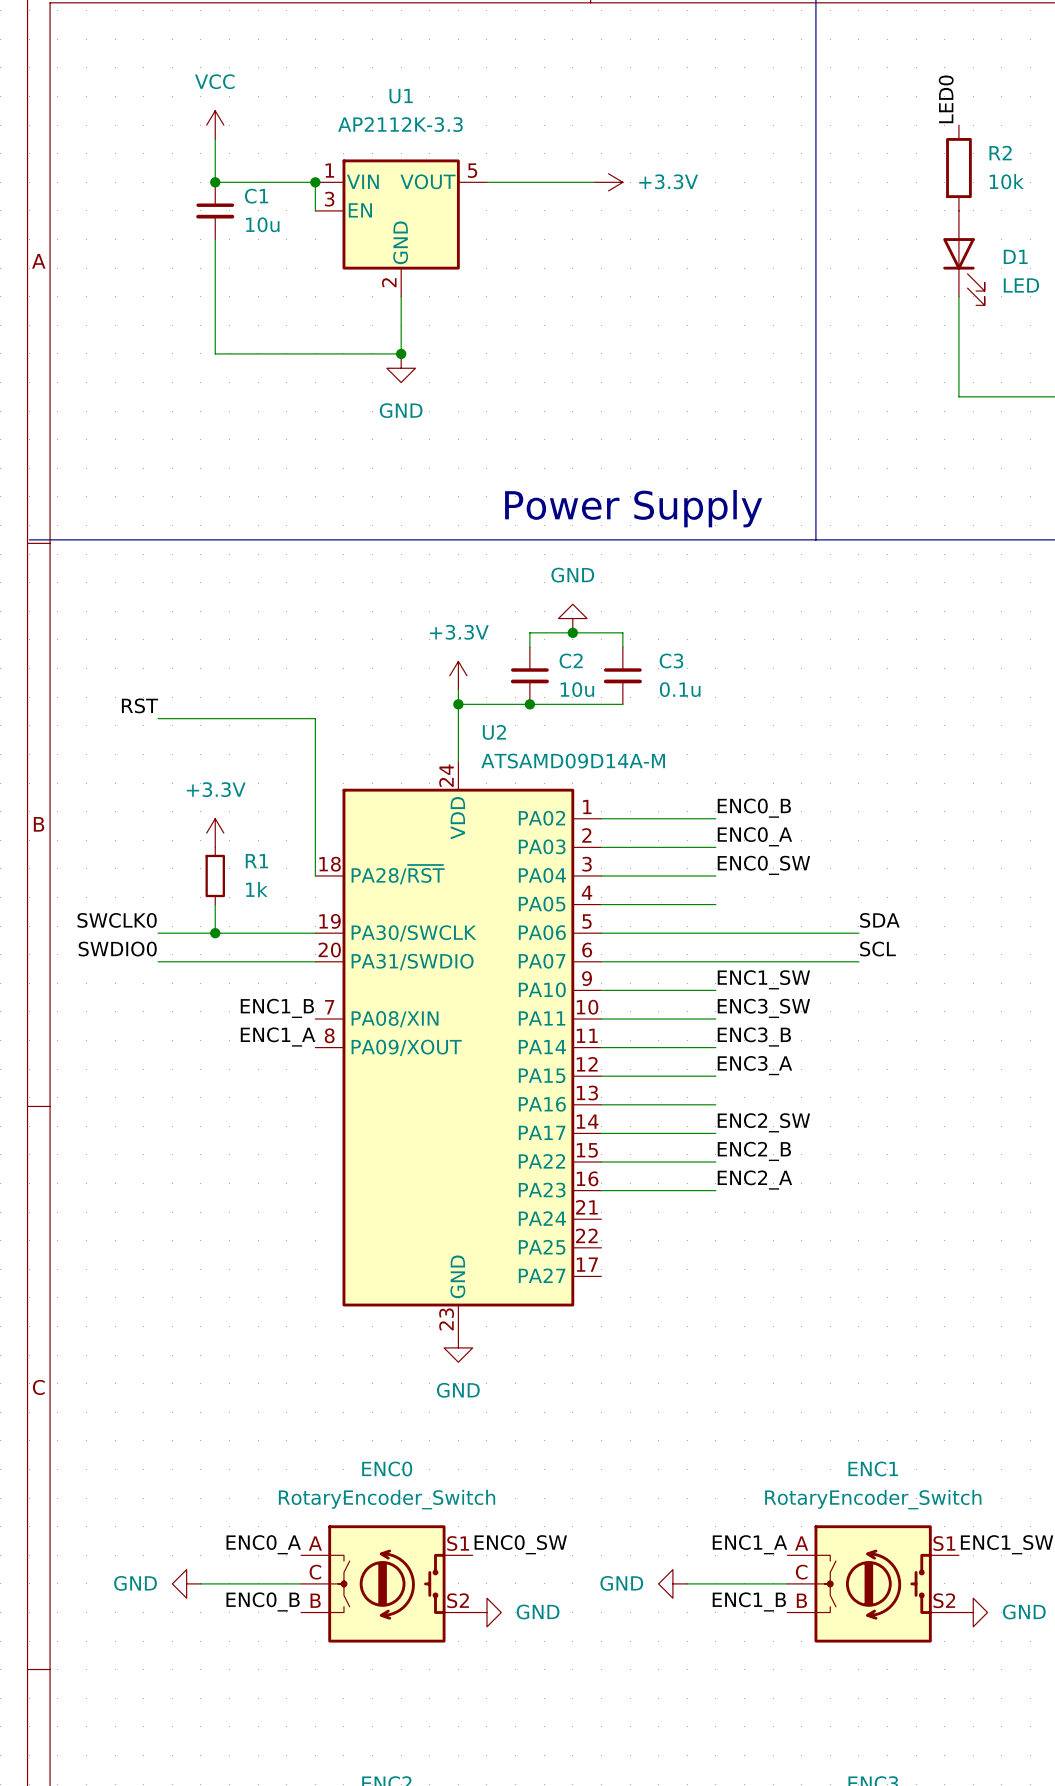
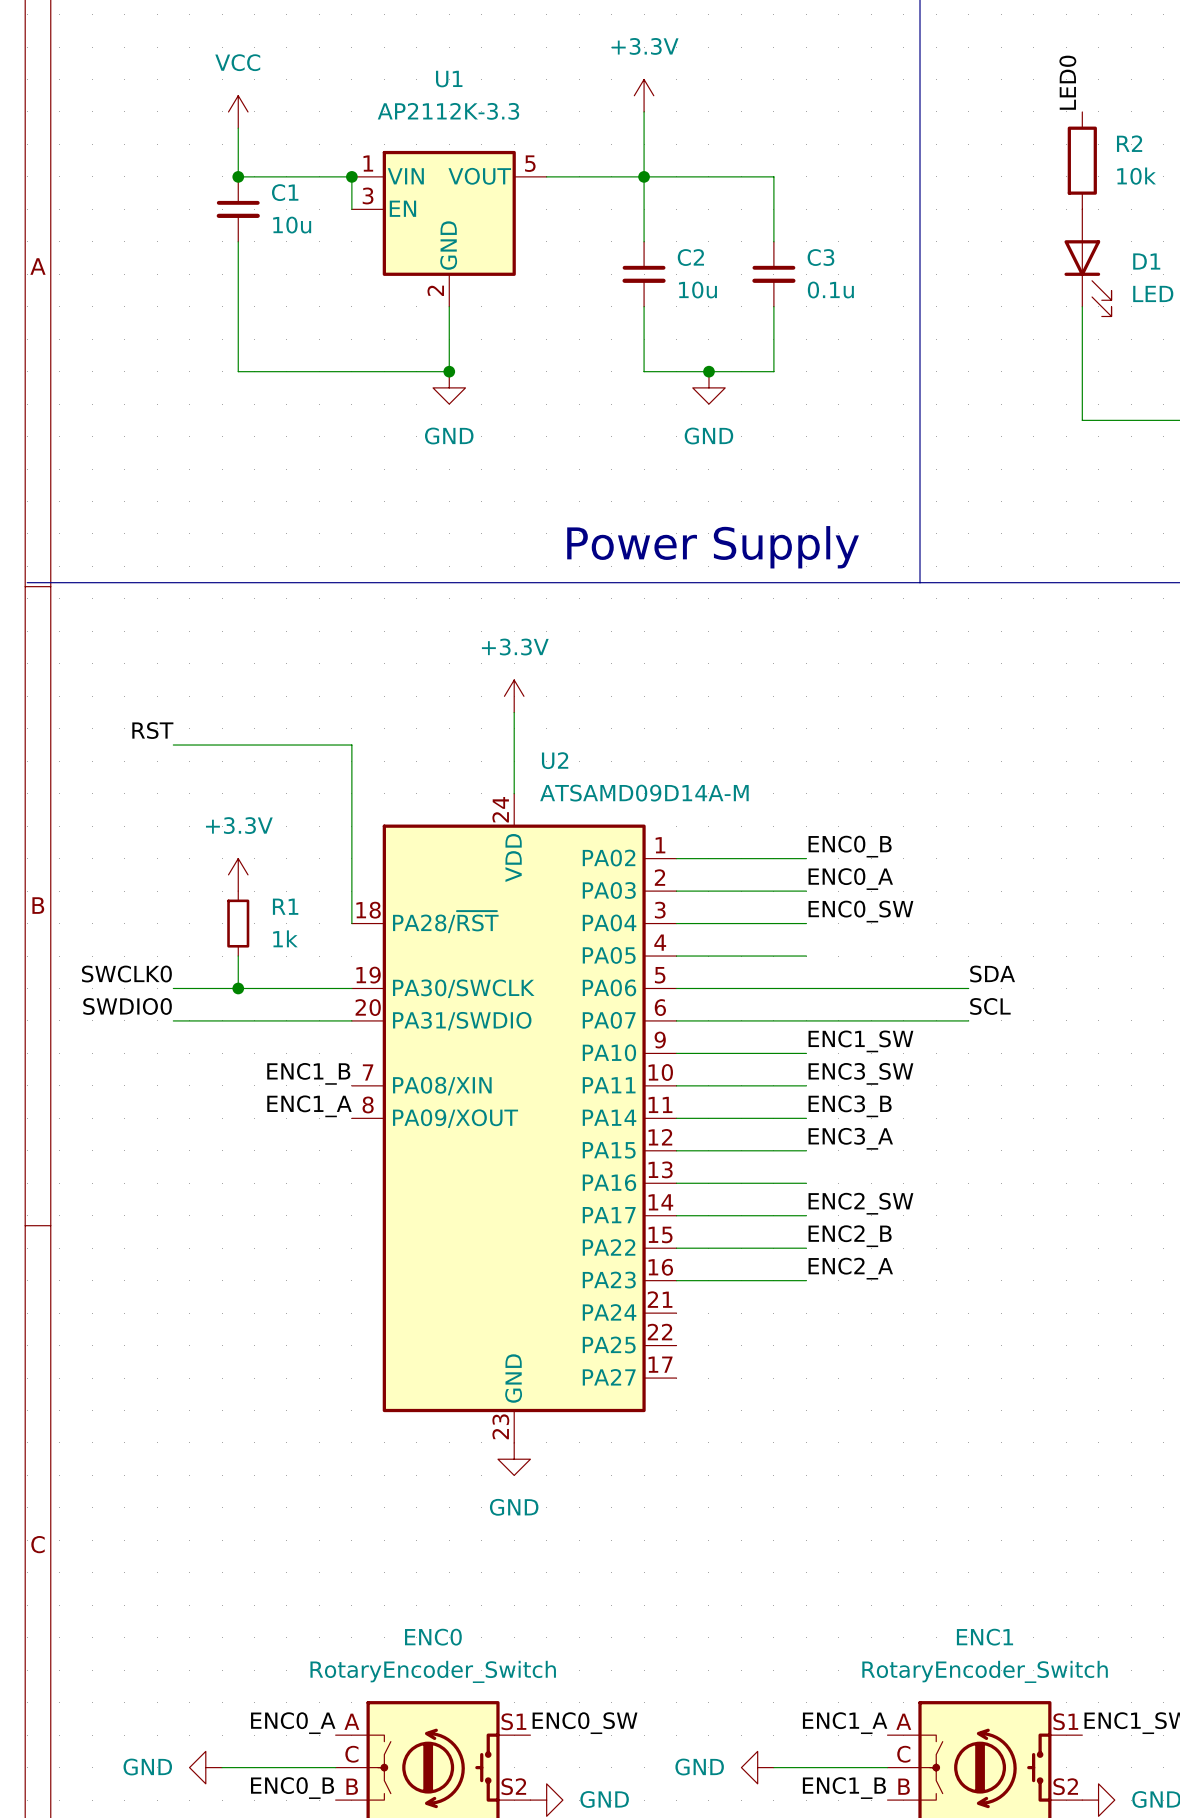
wire: none -> (644, 111) (644, 241)
power symbol text position: +3.3V (668, 181) -> +3.3V (645, 46)
junction: none -> (644, 176)
wire: none -> (668, 176) (773, 176) (773, 241)
power symbol rotation: 0° (608, 182) -> 90° counterclockwise (644, 95)
power symbol position: +3.3V (608, 182) -> +3.3V (644, 95)
wire: none -> (644, 306) (644, 371) (773, 371) (773, 306)
junction: none -> (708, 371)
power symbol rotation: 0° (572, 618) -> 180° (708, 387)
power symbol position: GND (572, 618) -> GND (708, 387)
junction: (572, 632) -> none
wire: (529, 647) (529, 632) (622, 632) (622, 647) -> none
C3 name position: C3 (671, 660) -> C3 (820, 257)
power symbol position: +3.3V (458, 675) -> +3.3V (514, 696)
C2 position: (529, 675) -> (644, 274)
C3 position: (622, 675) -> (773, 274)
C3 value position: 0.1u (680, 689) -> 0.1u (830, 290)
wire: (458, 704) (622, 704) -> none
junction: (458, 704) -> none
junction: (529, 704) -> none
label position: RST (140, 705) -> RST (152, 730)
wire: (158, 718) (315, 718) -> (173, 745) (351, 745) (351, 785)
label position: ENC0_B (754, 808) -> ENC0_B (850, 846)
wire: (601, 818) (715, 818) -> (676, 858) (806, 858)
power symbol position: +3.3V (215, 833) -> +3.3V (238, 874)
label position: ENC0_A (754, 836) -> ENC0_A (850, 879)
wire: (315, 840) (315, 875) -> none
wire: (601, 847) (715, 847) -> (676, 891) (806, 891)
label position: ENC0_SW (763, 865) -> ENC0_SW (860, 911)
R1 position: (215, 875) -> (238, 923)
wire: (601, 875) (715, 875) -> (676, 923) (806, 923)
wire: (215, 904) (215, 933) -> (238, 956) (238, 988)
wire: (601, 904) (715, 904) -> (676, 956) (806, 956)
label position: SWCLK0 (117, 920) -> SWCLK0 (126, 974)
label position: SDA (879, 920) -> SDA (992, 974)
wire: (158, 933) (315, 933) -> (173, 988) (351, 988)
junction position: (215, 933) -> (238, 988)
wire: (601, 933) (858, 933) -> (676, 988) (968, 988)
label position: SWDIO0 (117, 949) -> SWDIO0 (127, 1006)
label position: SCL (877, 949) -> SCL (990, 1006)
wire: (158, 961) (315, 961) -> (173, 1020) (351, 1020)
wire: (601, 961) (858, 961) -> (676, 1020) (968, 1020)
label position: ENC1_SW (763, 979) -> ENC1_SW (860, 1041)
wire: (601, 990) (715, 990) -> (676, 1053) (806, 1053)
label position: ENC1_B (277, 1008) -> ENC1_B (308, 1073)
label position: ENC3_SW (763, 1008) -> ENC3_SW (860, 1073)
wire: (601, 1018) (715, 1018) -> (676, 1085) (806, 1085)
label position: ENC1_A (278, 1037) -> ENC1_A (309, 1106)
label position: ENC3_B (754, 1037) -> ENC3_B (850, 1106)
U2 position: (458, 1047) -> (514, 1118)
wire: (601, 1047) (715, 1047) -> (676, 1118) (806, 1118)
label position: ENC3_A (754, 1065) -> ENC3_A (850, 1138)
wire: (601, 1076) (715, 1076) -> (676, 1150) (806, 1150)
wire: (601, 1104) (715, 1104) -> (676, 1183) (806, 1183)
label position: ENC2_SW (763, 1122) -> ENC2_SW (860, 1203)
wire: (601, 1133) (715, 1133) -> (676, 1215) (806, 1215)
label position: ENC2_B (754, 1151) -> ENC2_B (850, 1236)
wire: (601, 1162) (715, 1162) -> (676, 1248) (806, 1248)
label position: ENC2_A (754, 1180) -> ENC2_A (850, 1268)
wire: (601, 1190) (715, 1190) -> (676, 1280) (806, 1280)
power symbol position: GND (458, 1347) -> GND (514, 1459)

